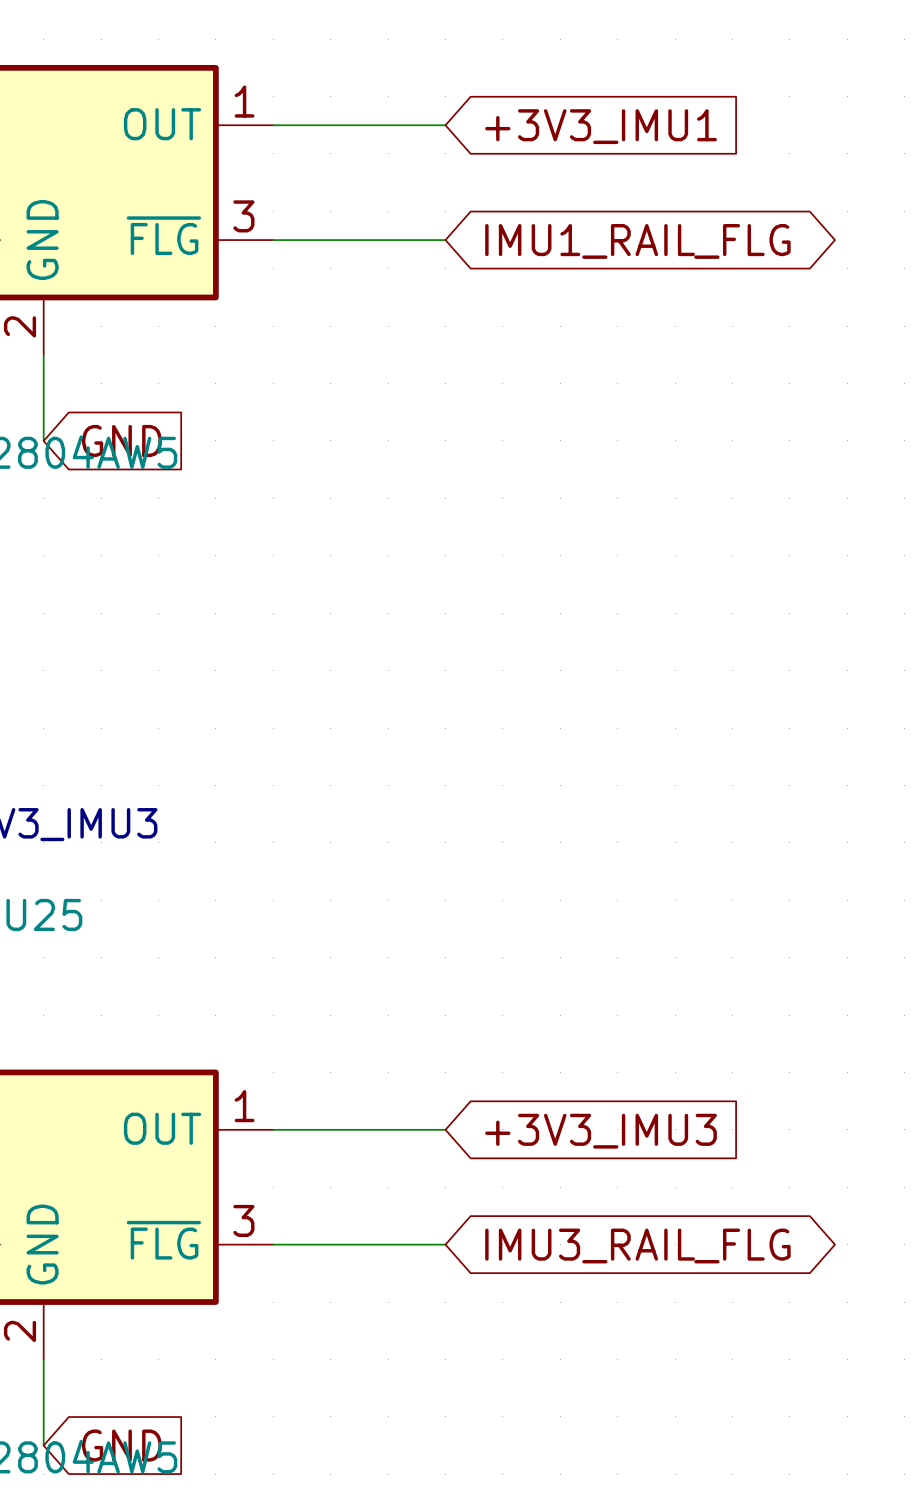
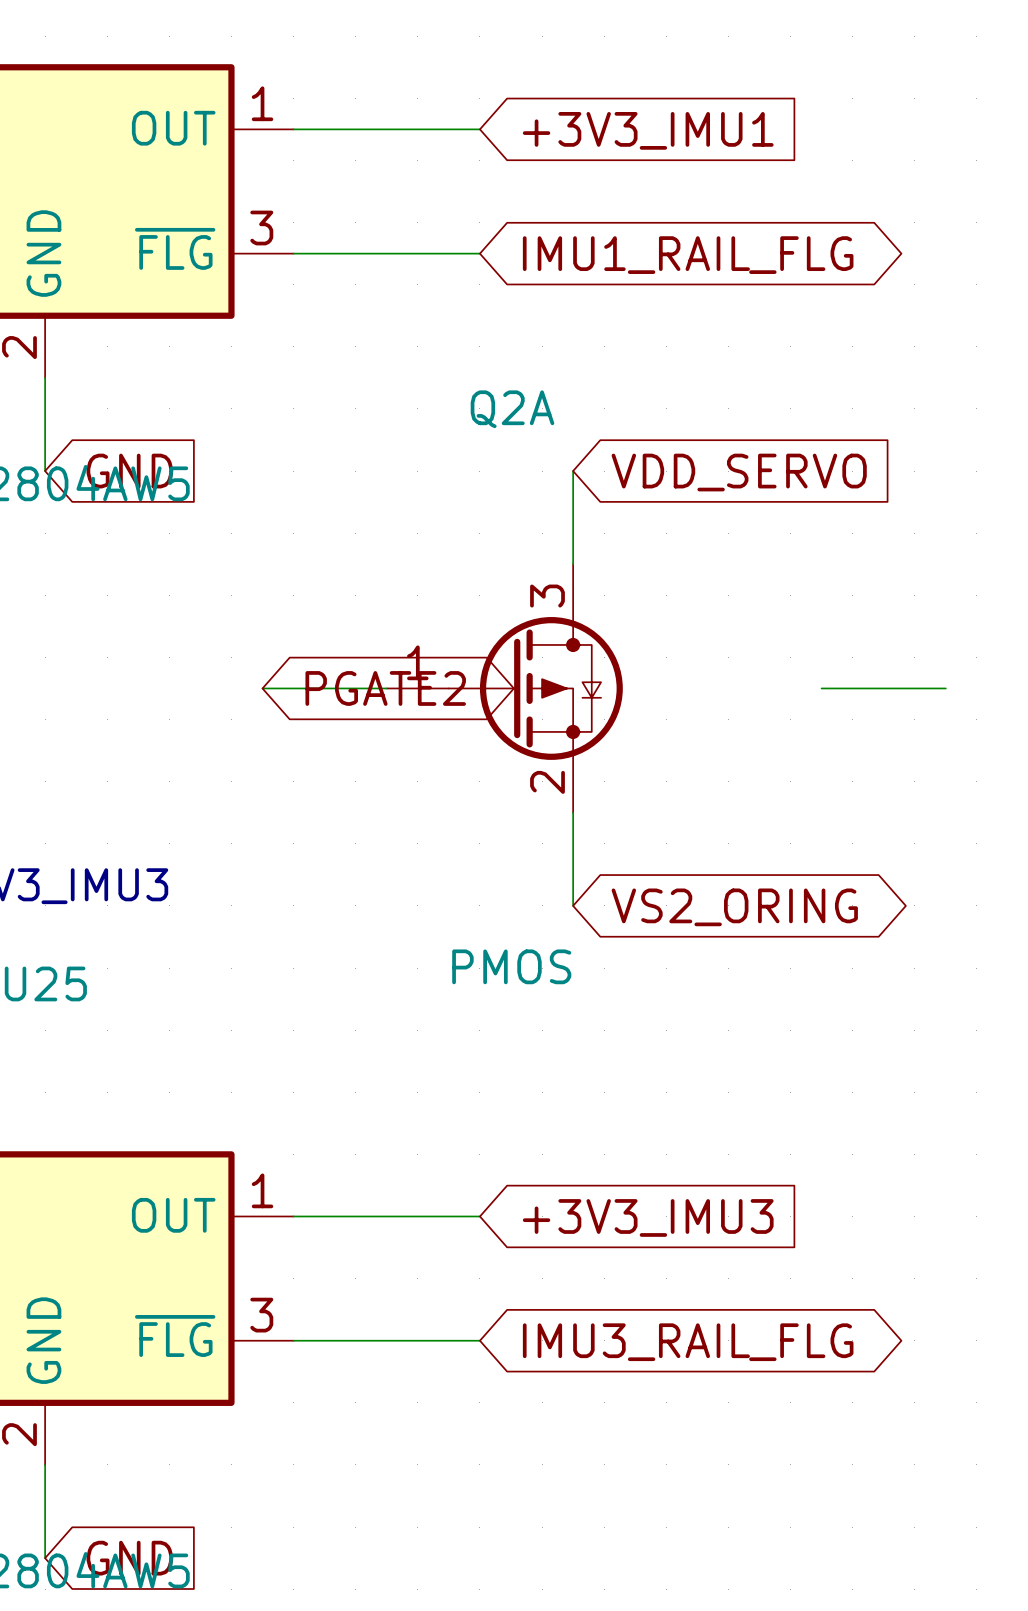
wire: none -> (573, 471) (573, 564)
global label: none -> VDD_SERVO (739, 472)
wire: none -> (262, 688) (386, 688)
global label: none -> PGATE2 (385, 688)
Q2A: none -> PMOS (504, 688)
wire: none -> (821, 688) (945, 688)
wire: none -> (573, 812) (573, 905)
global label: none -> VS2_ORING (734, 907)

